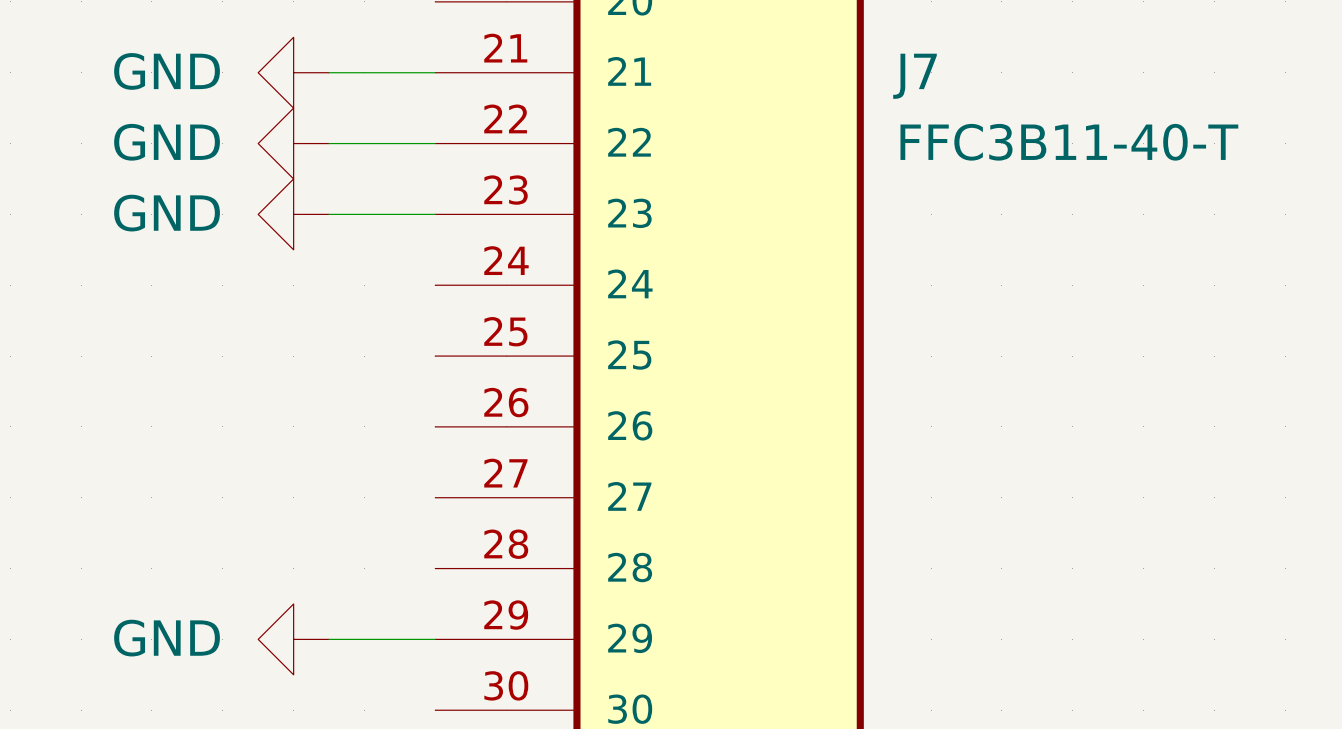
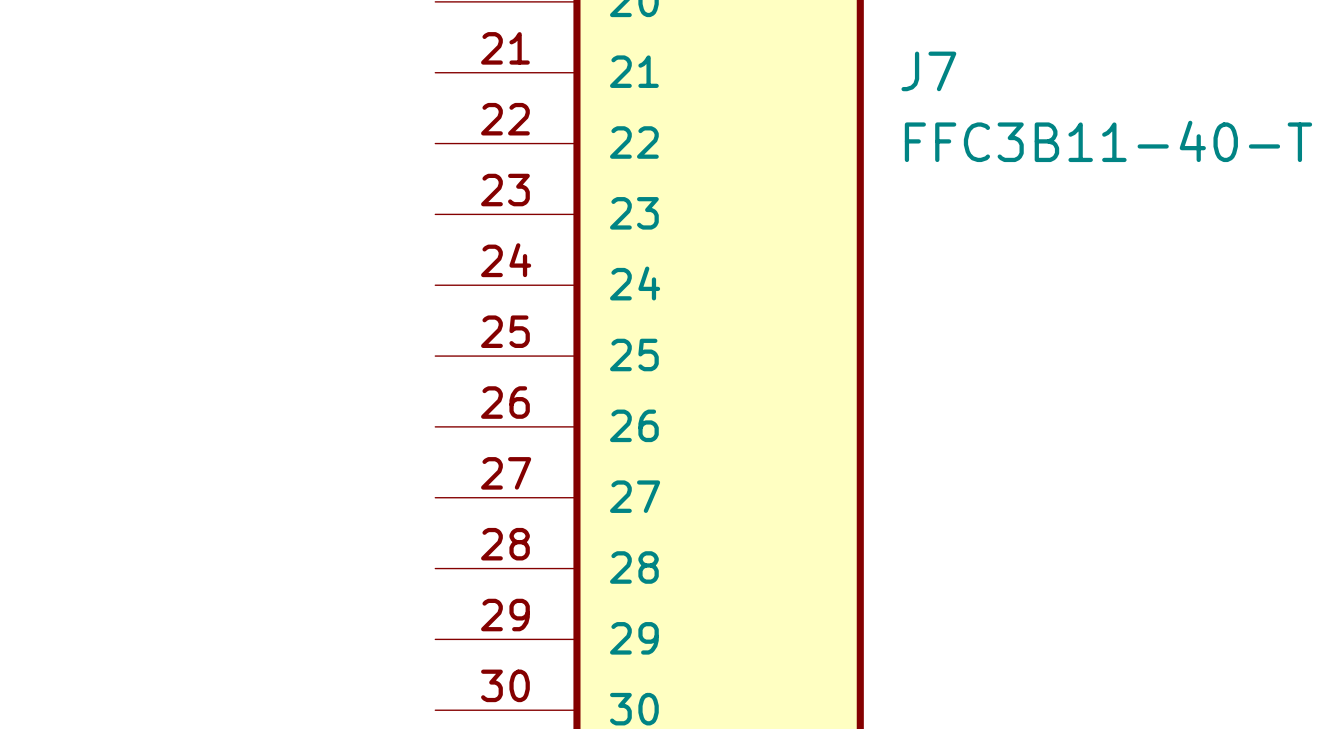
power symbol: GND (293, 72) -> none
wire: (329, 72) (435, 72) -> none
power symbol: GND (293, 143) -> none
wire: (329, 143) (435, 143) -> none
power symbol: GND (293, 214) -> none
wire: (329, 214) (435, 214) -> none
power symbol: GND (293, 639) -> none
wire: (329, 639) (435, 639) -> none

